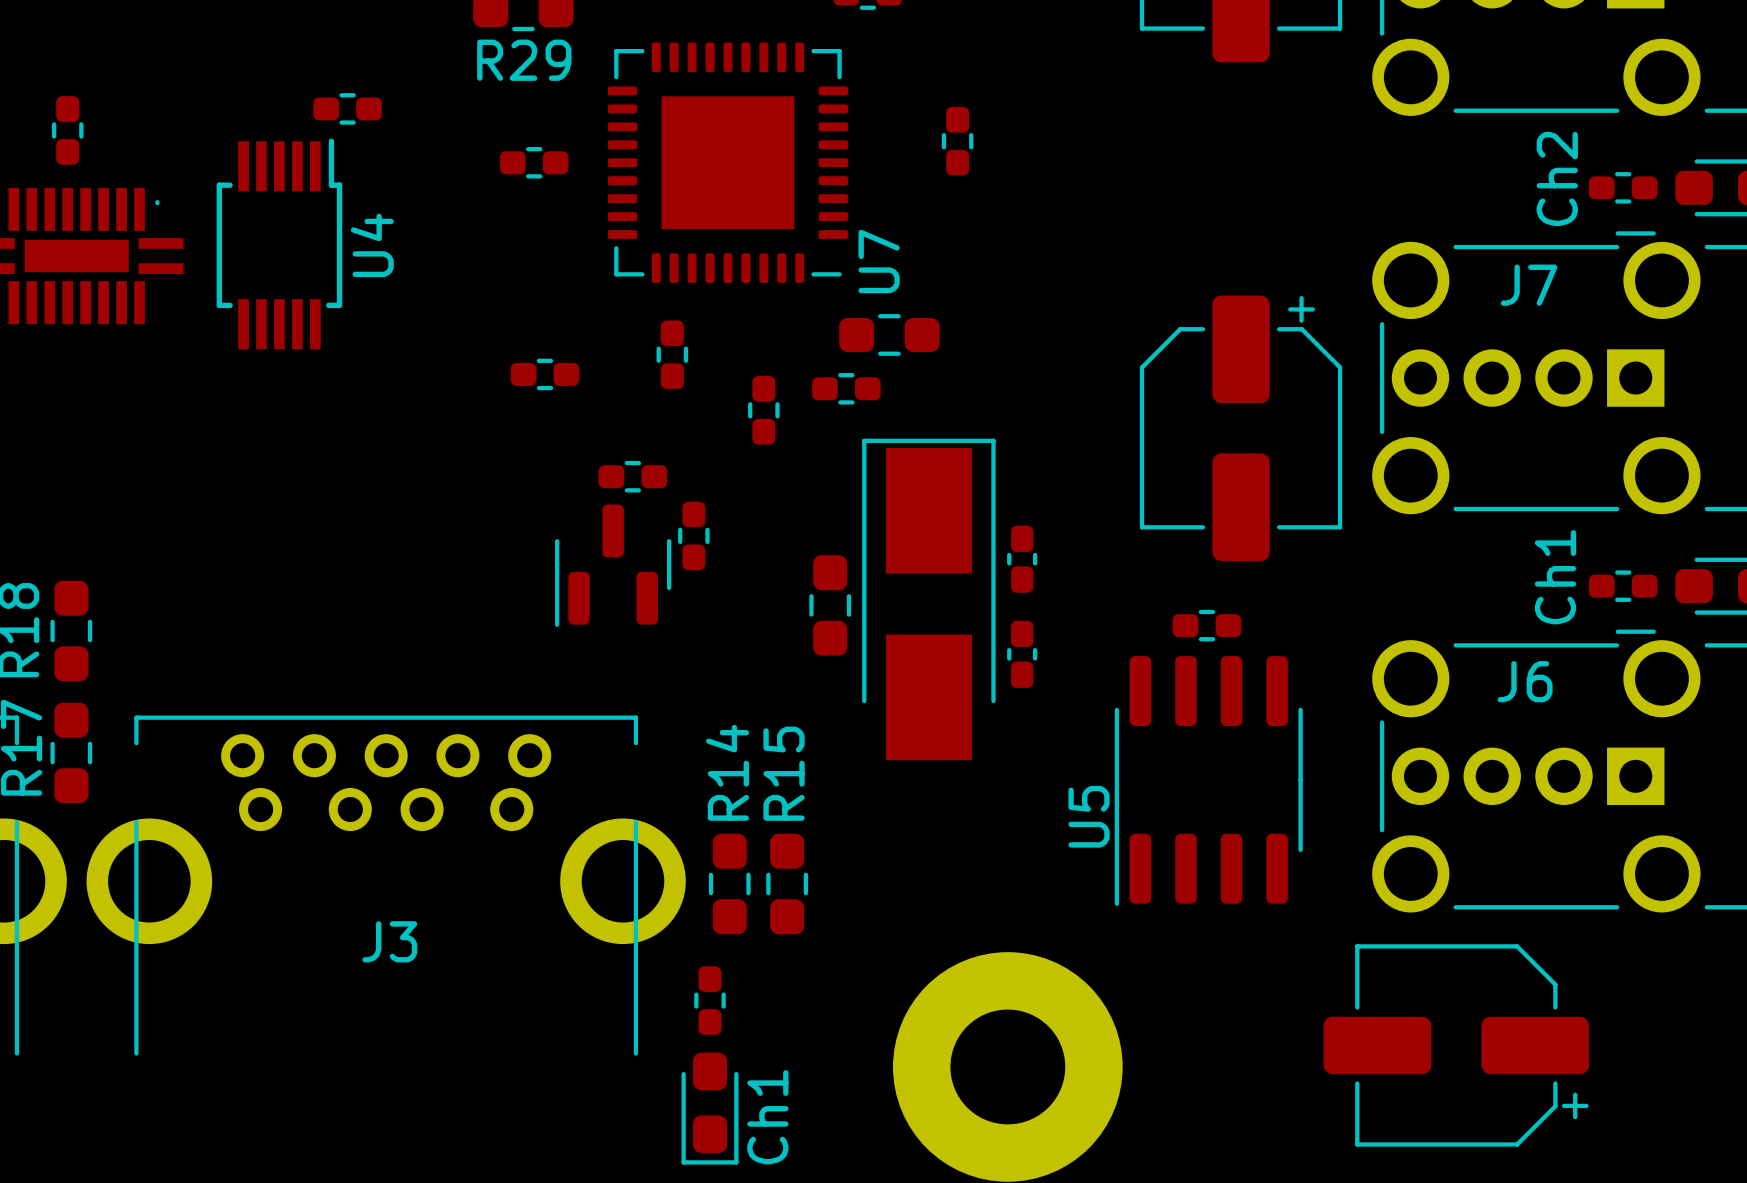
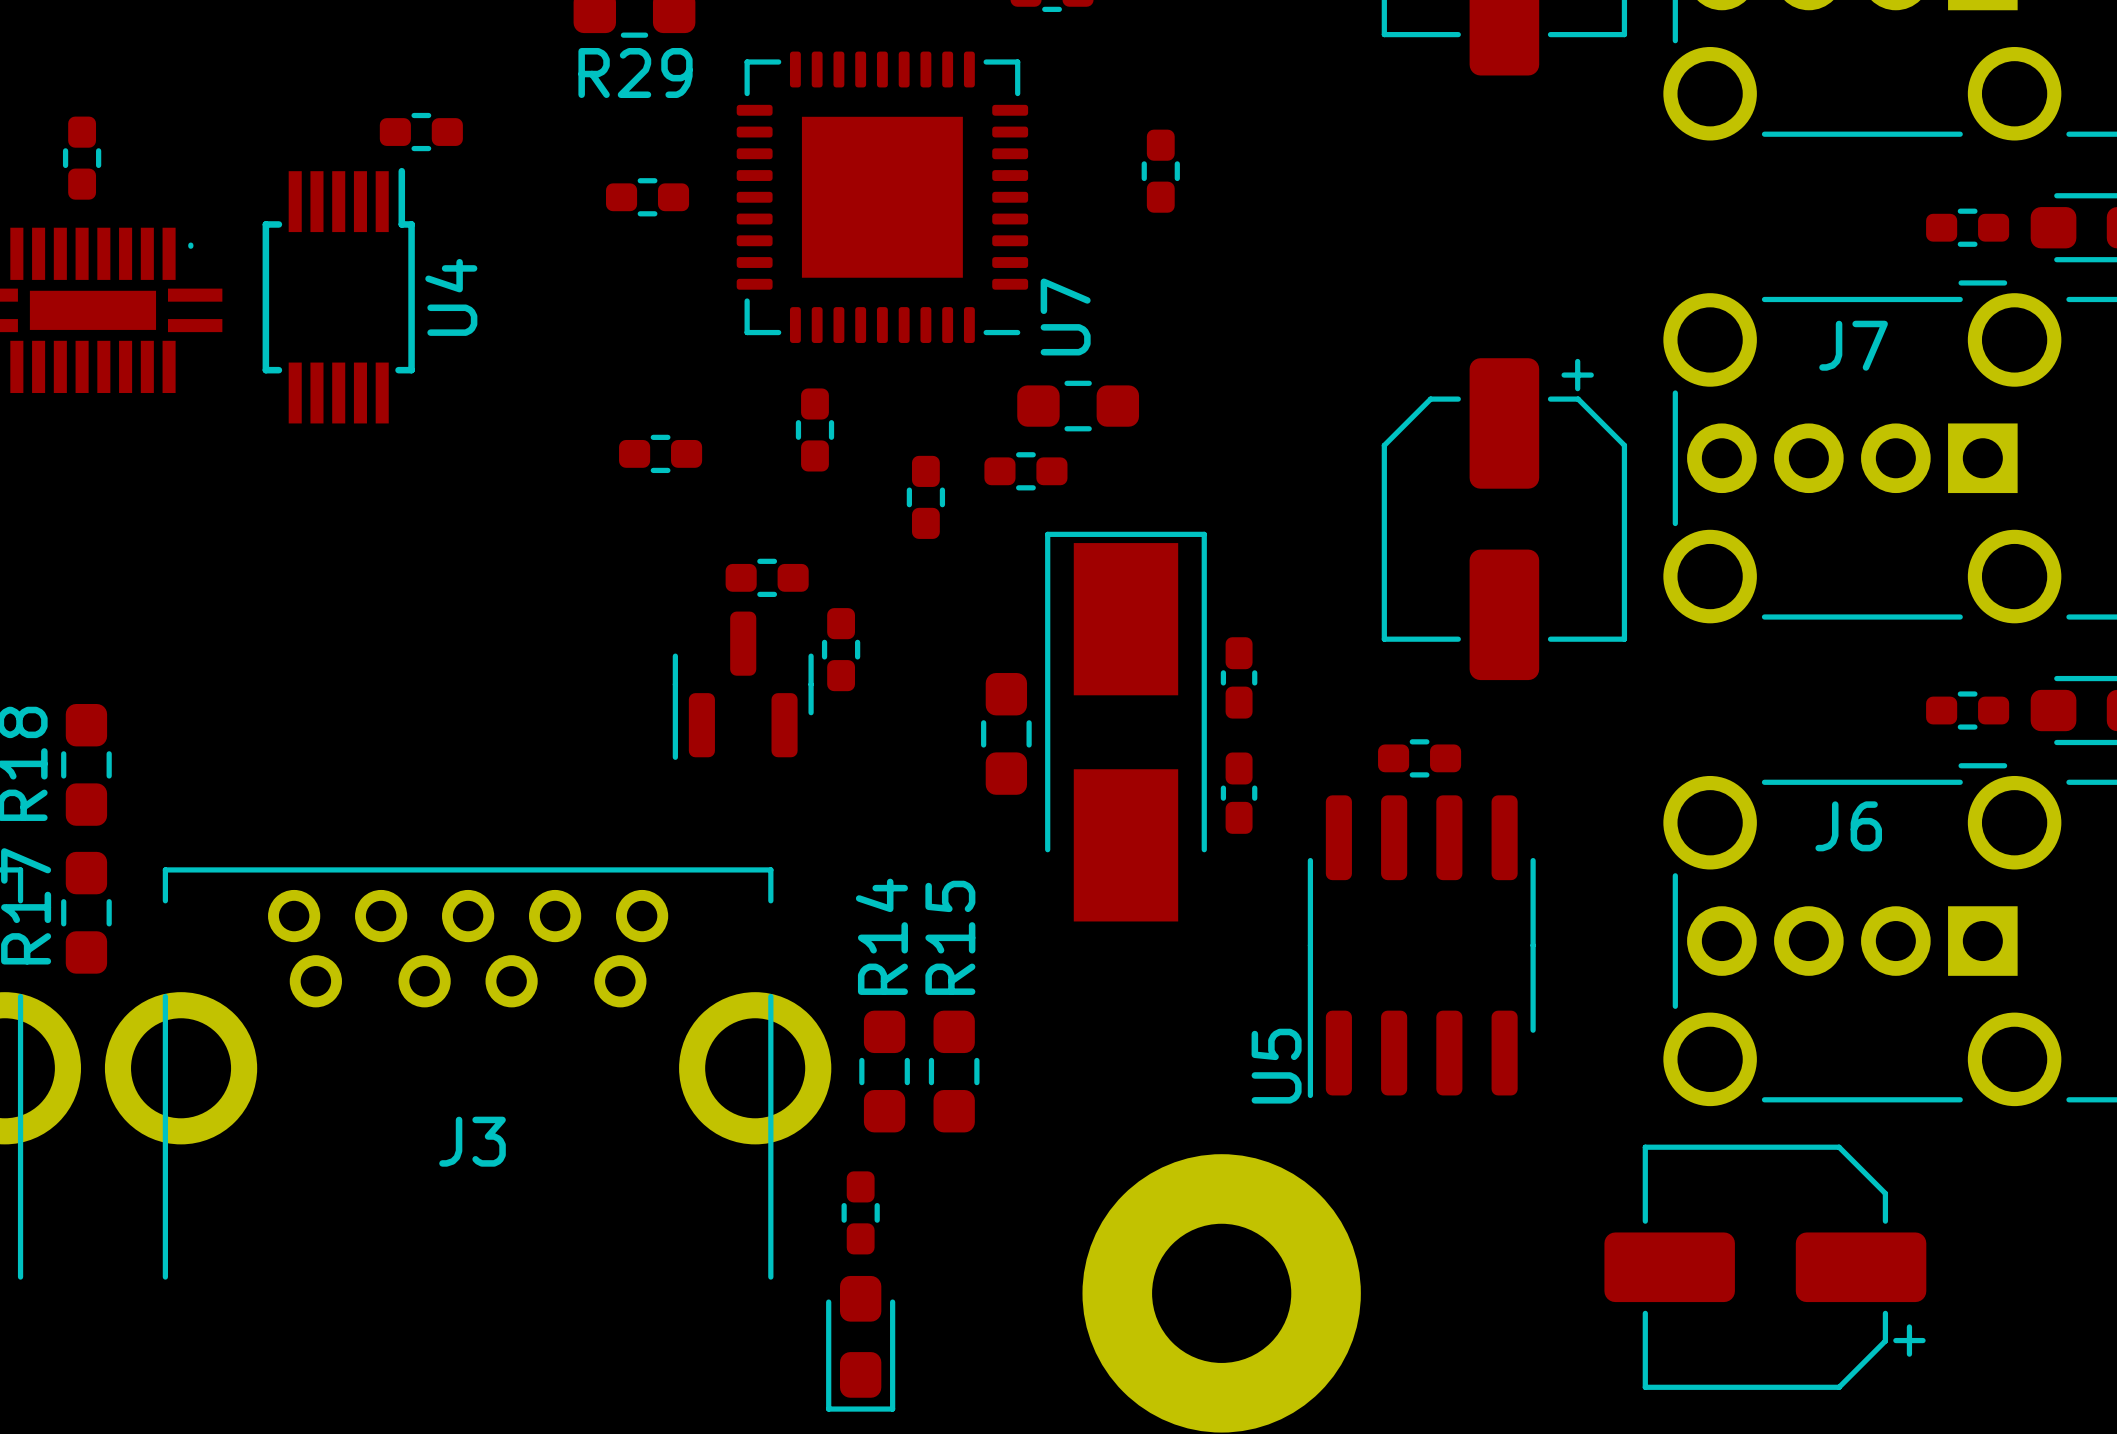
text: Ch2 (1557, 178) -> none
text: Ch1 (1555, 577) -> none
part position: (1206, 625) -> (1419, 758)
U5 position: (1208, 780) -> (1421, 946)
U5 name position: U5 (1089, 816) -> U5 (1276, 1066)
text: Ch1 (767, 1117) -> none

